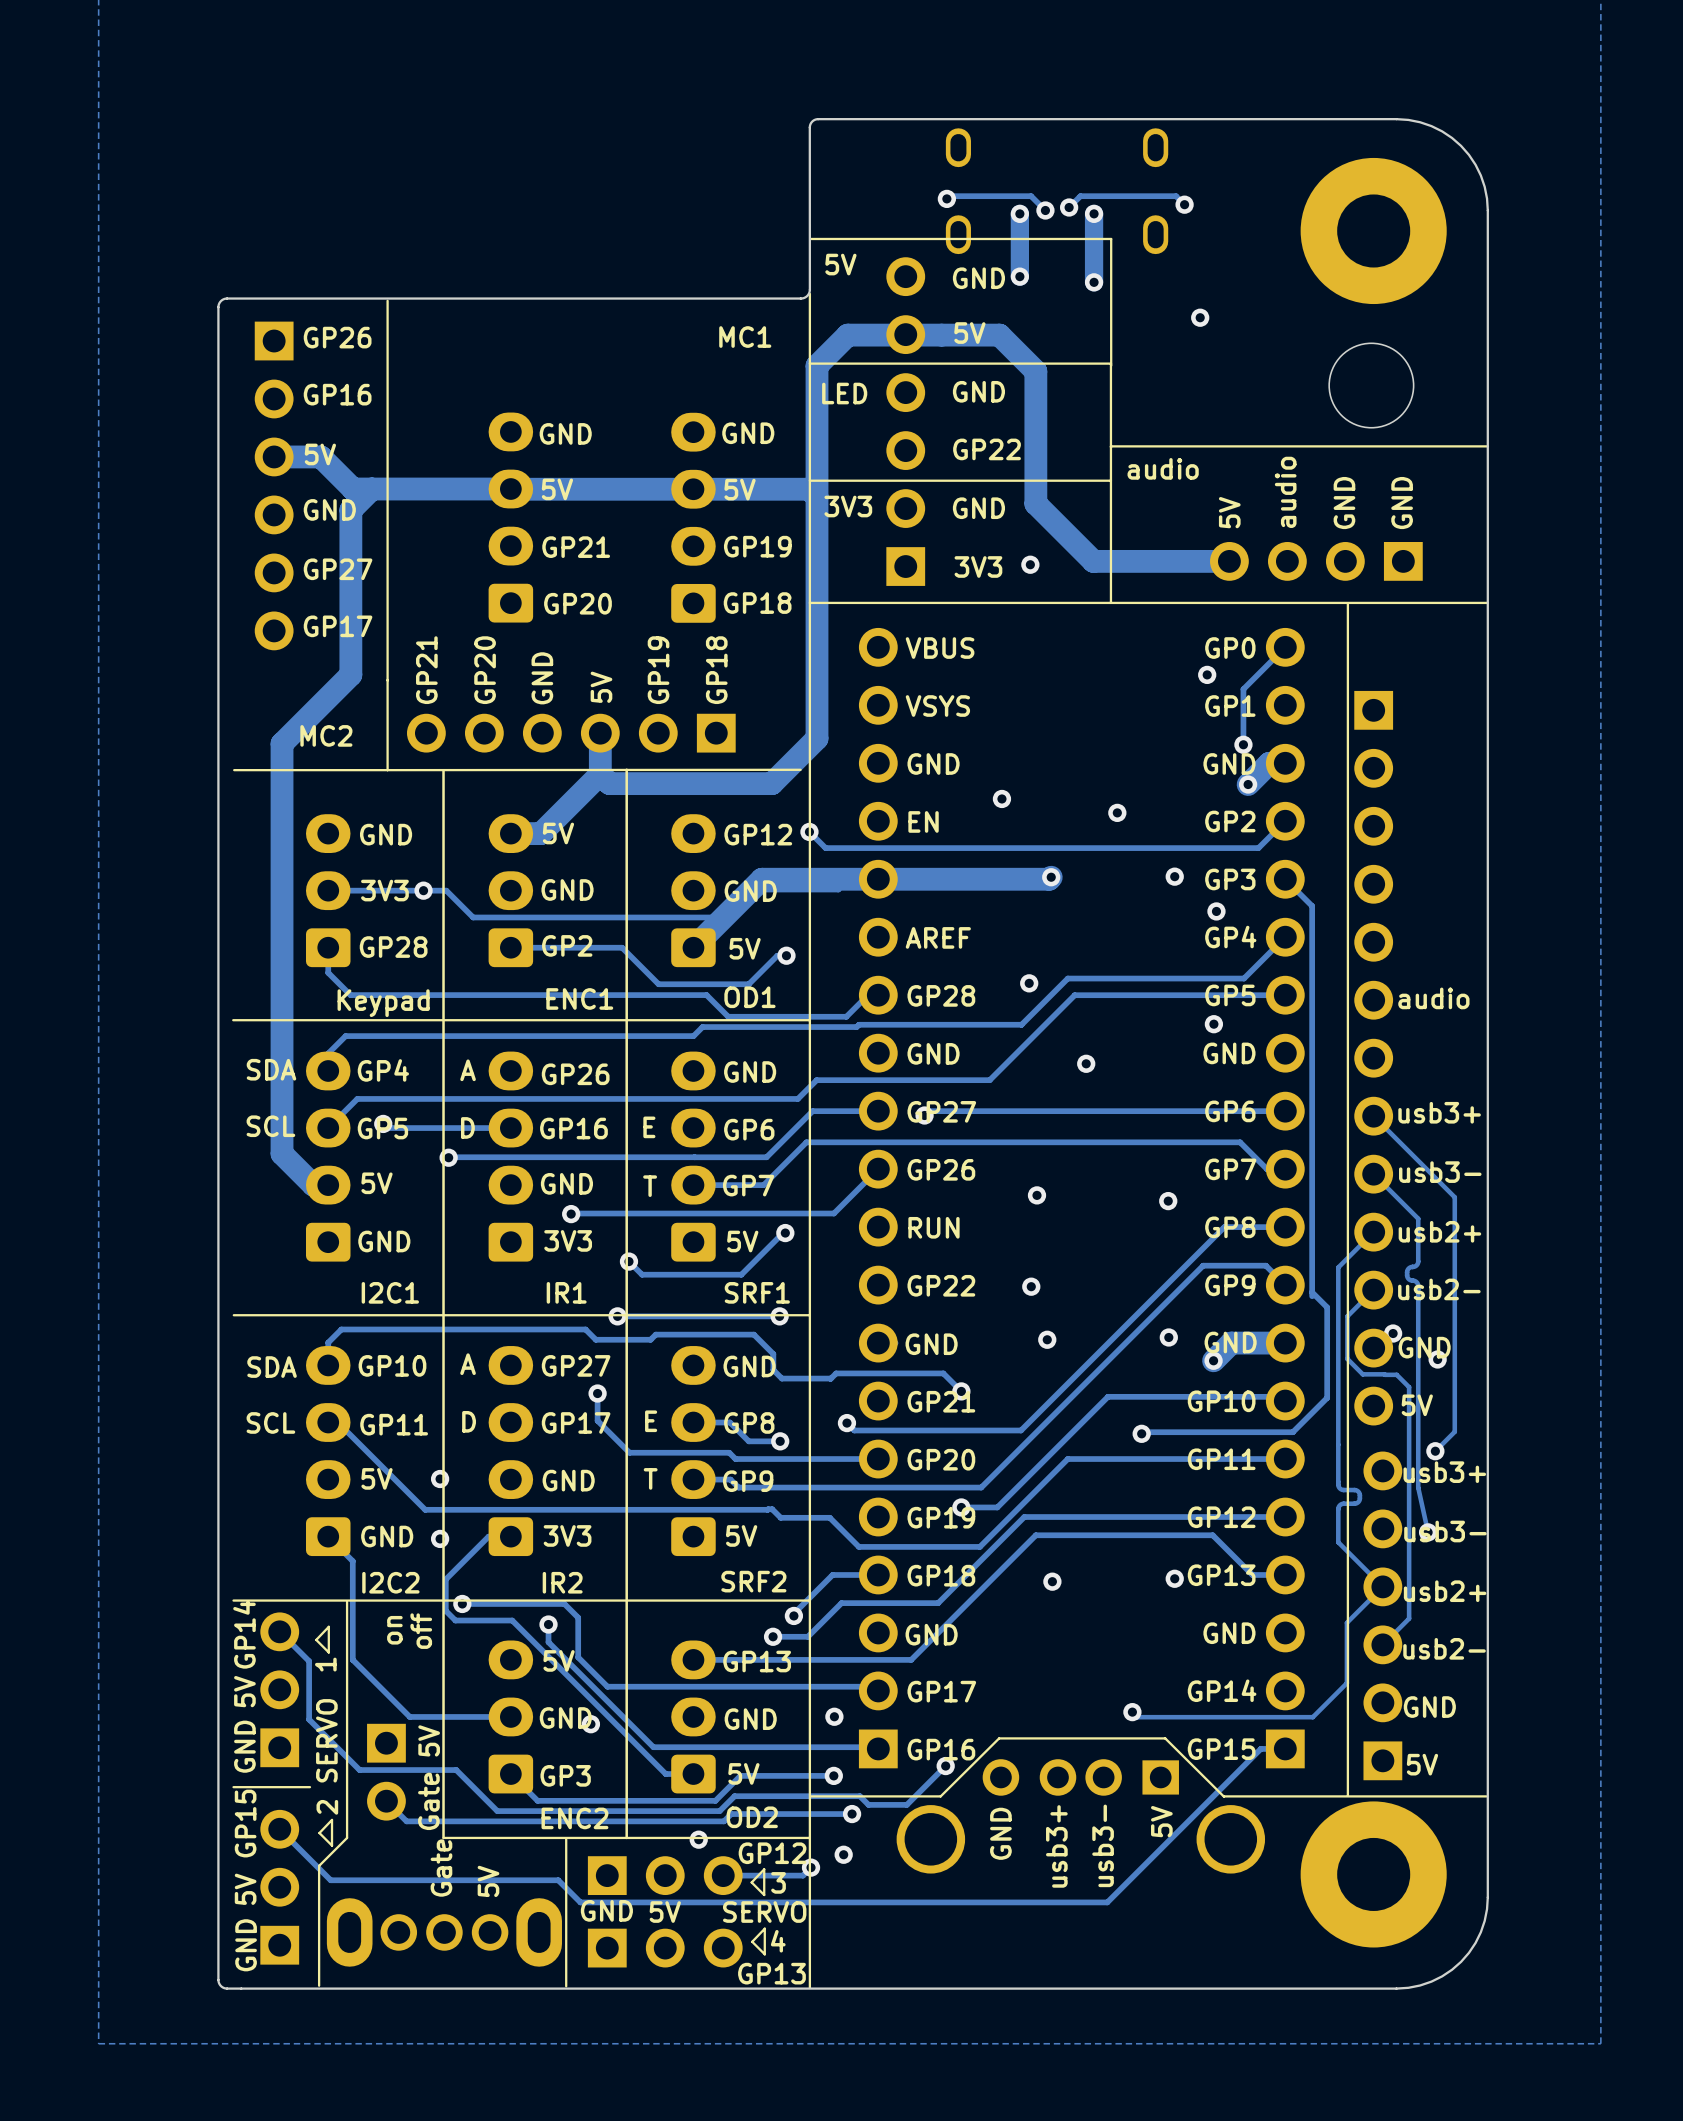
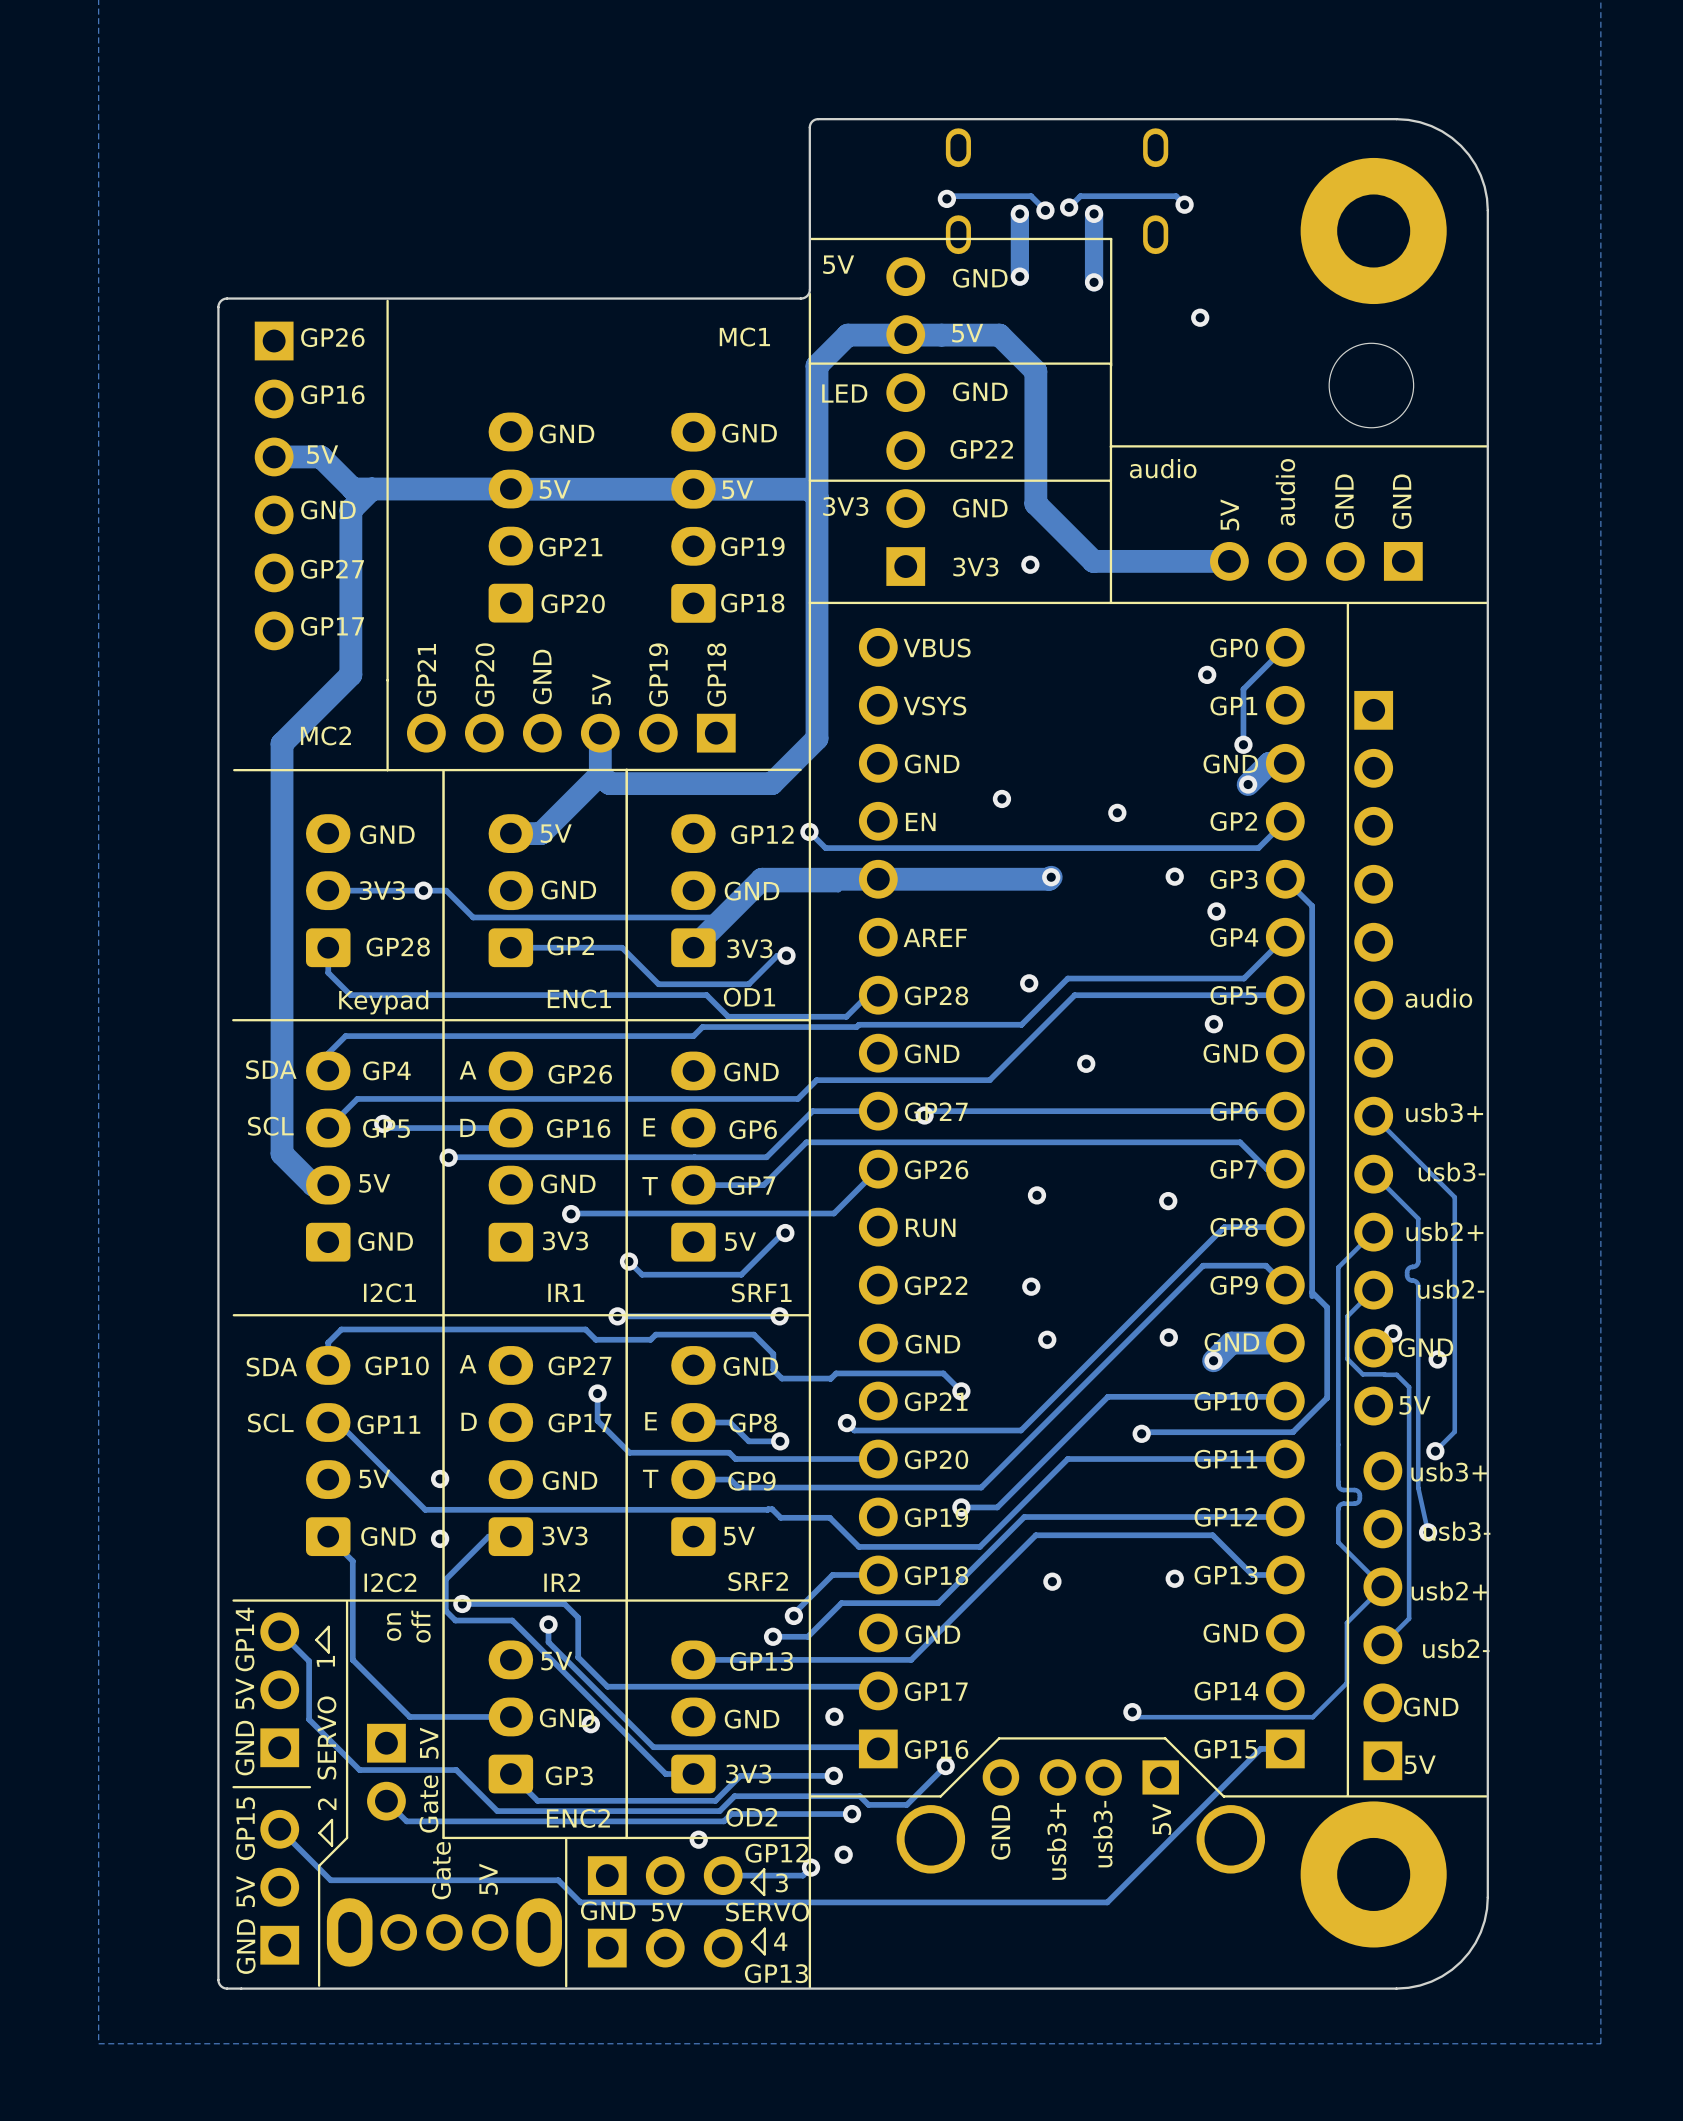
text: 5V (745, 948) -> 3V3 (749, 948)
text: 5V (743, 1773) -> 3V3 (748, 1773)

